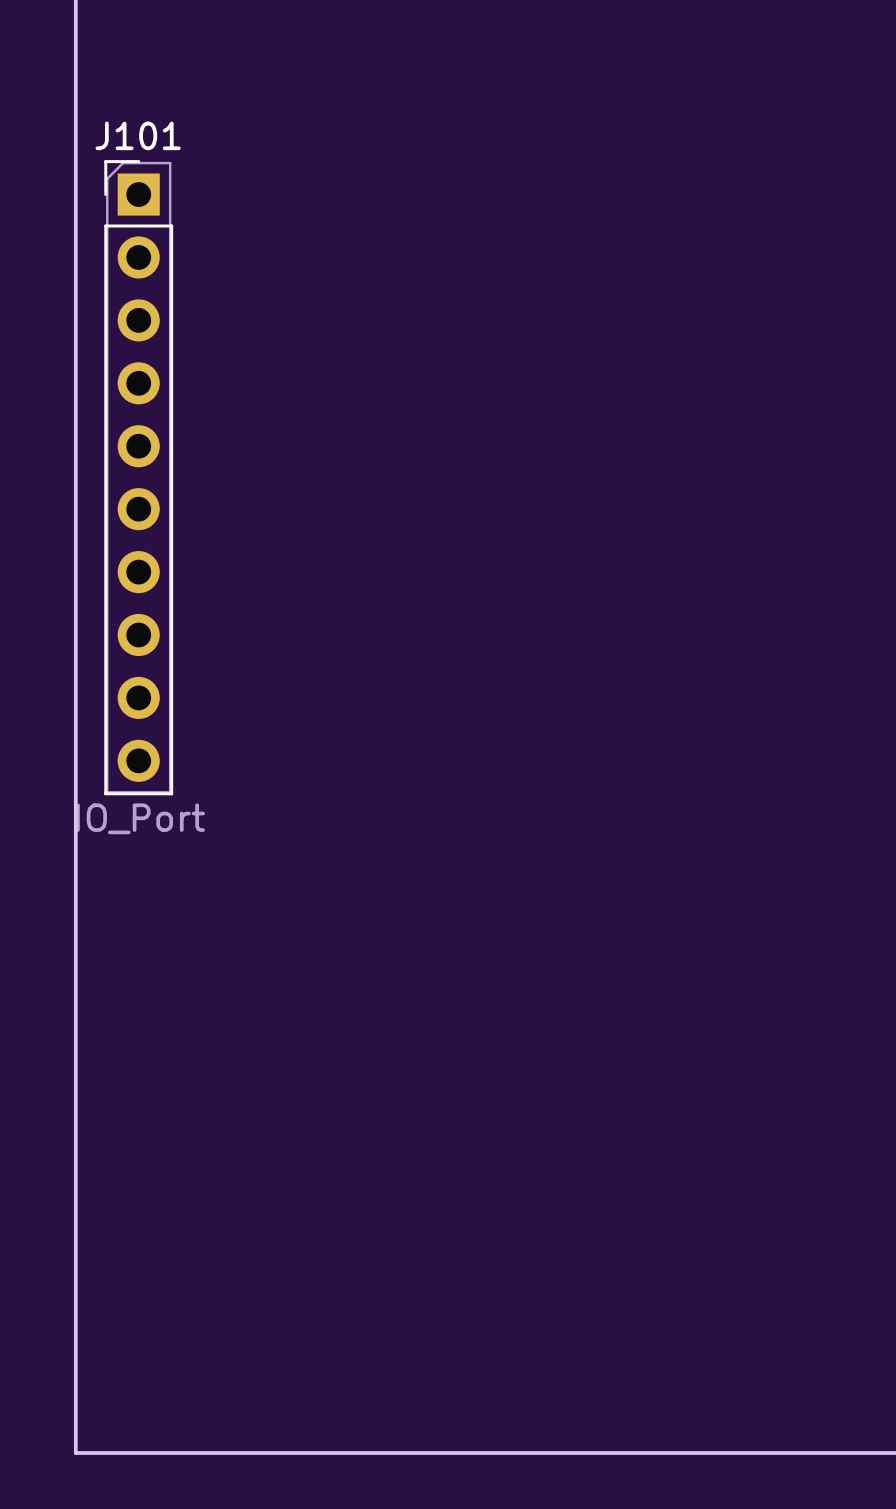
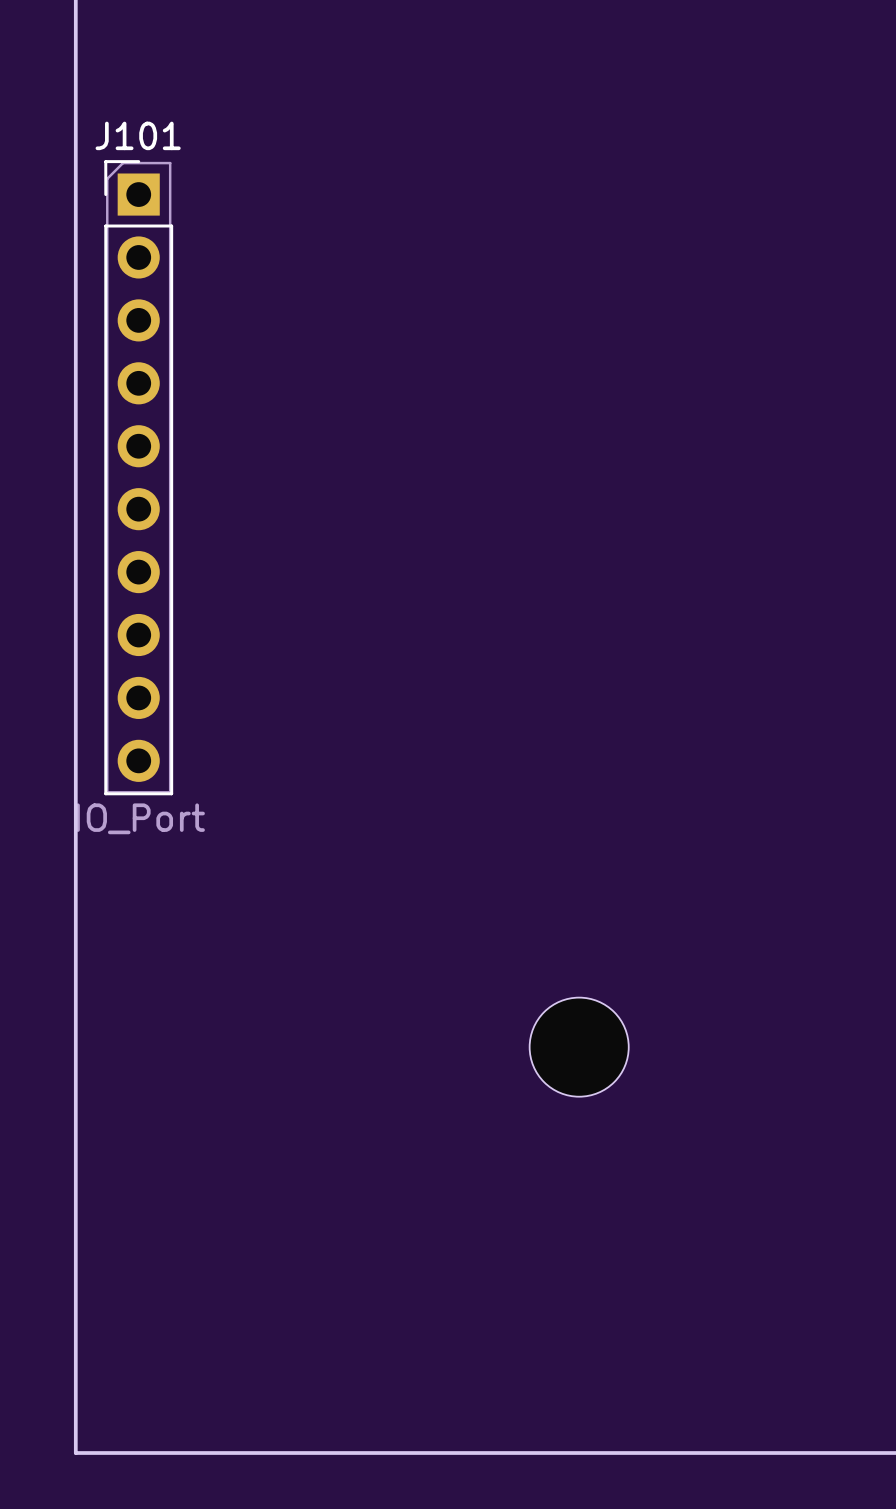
part: none -> (579, 1047)

